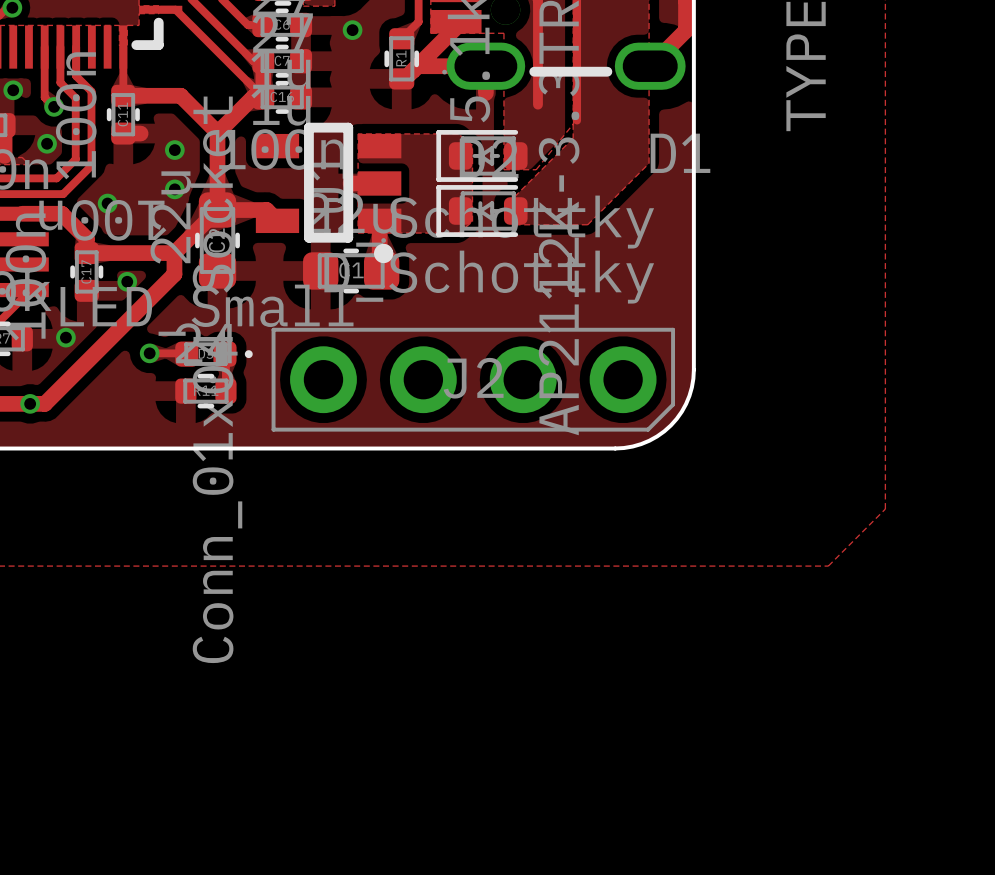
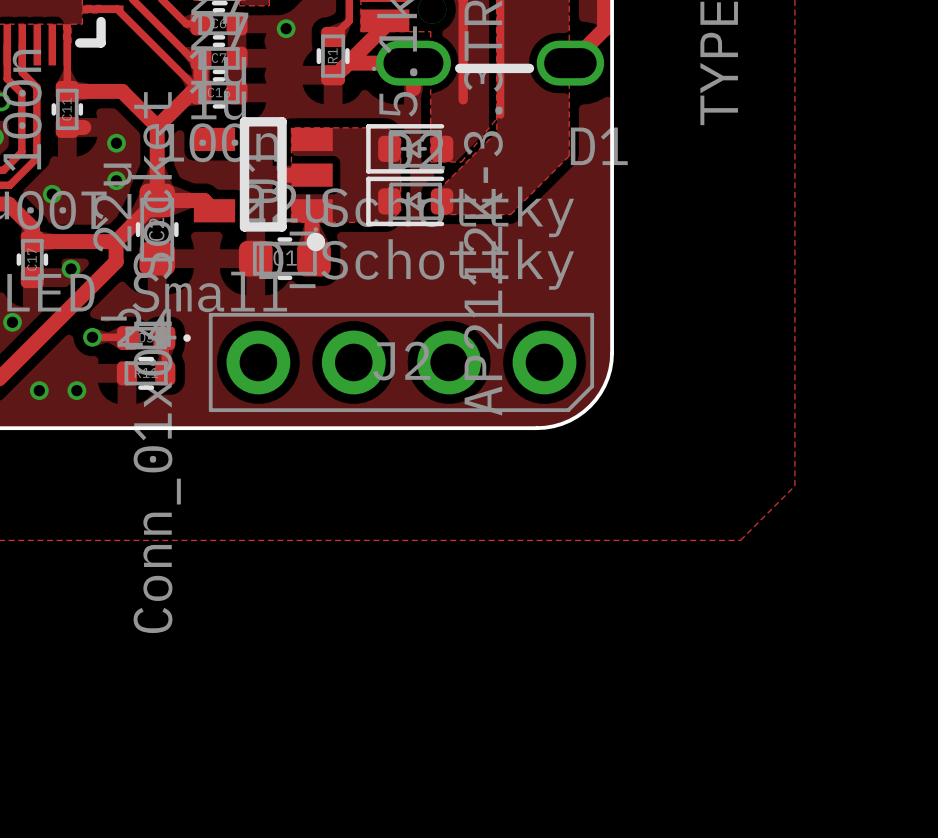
via: none -> (39, 390)
via: none -> (76, 390)

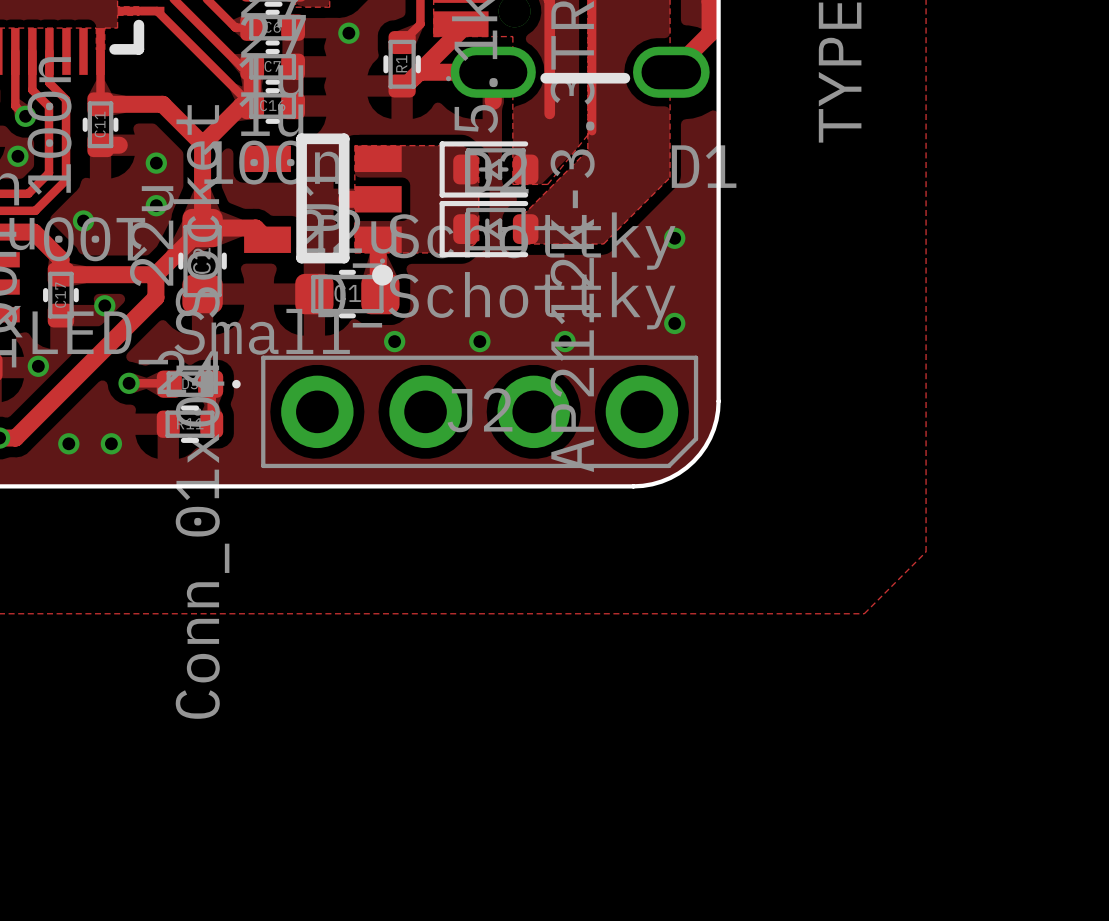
via: none -> (674, 238)
via: none -> (674, 323)
via: none -> (394, 341)
via: none -> (479, 341)
via: none -> (565, 341)

